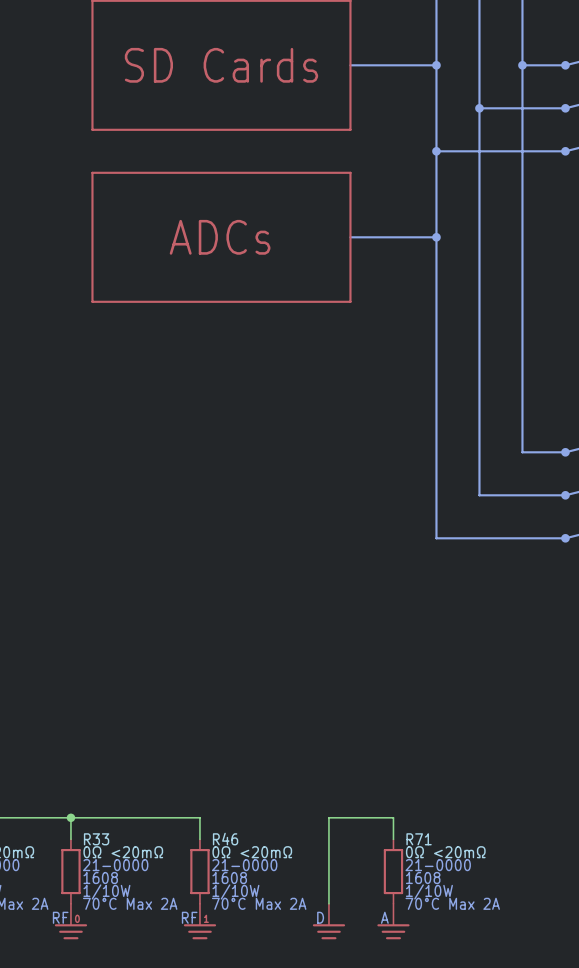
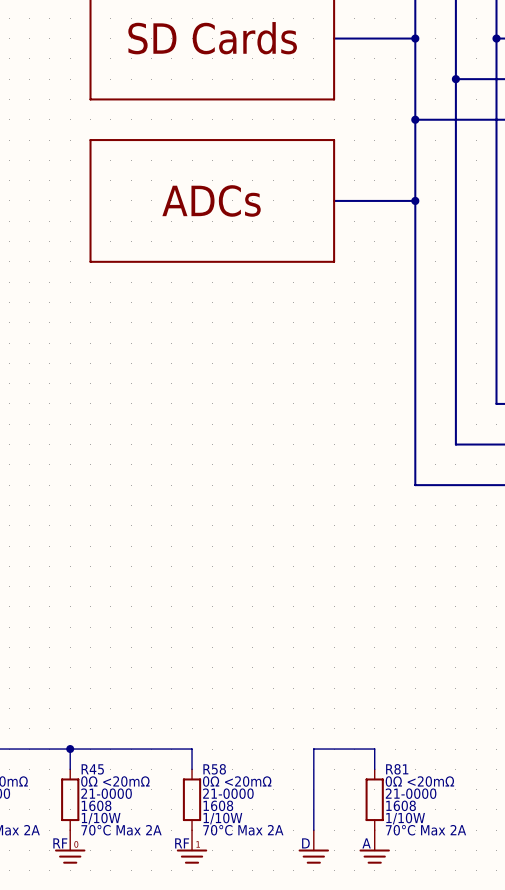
R33 name: R33 (96, 839) -> R45 (92, 769)
R46 name: R46 (225, 839) -> R58 (214, 769)
R71 name: R71 (419, 839) -> R81 (397, 769)

